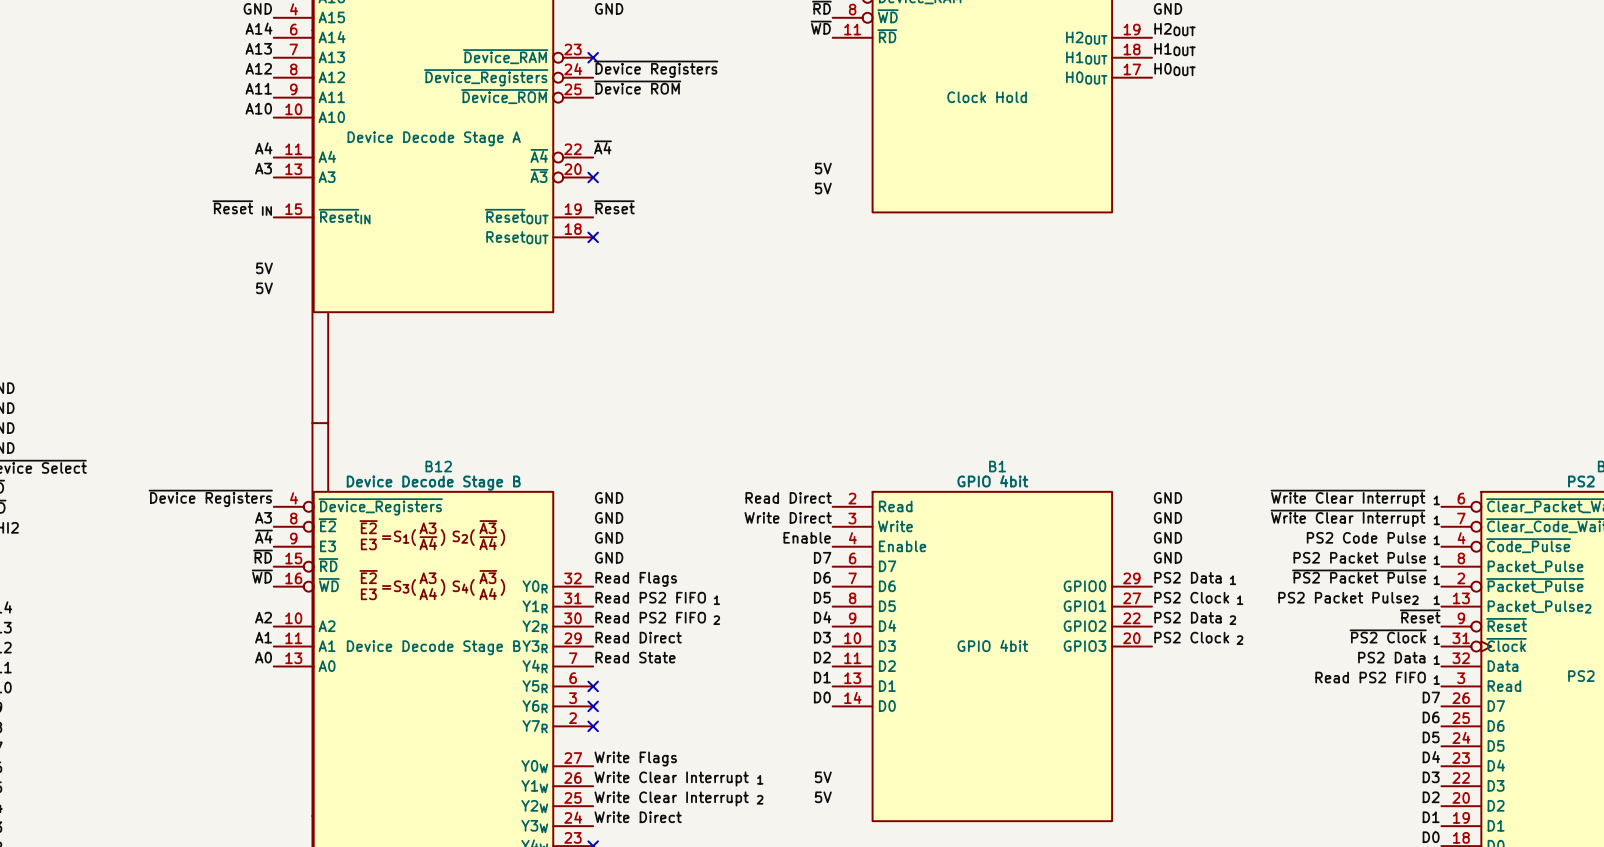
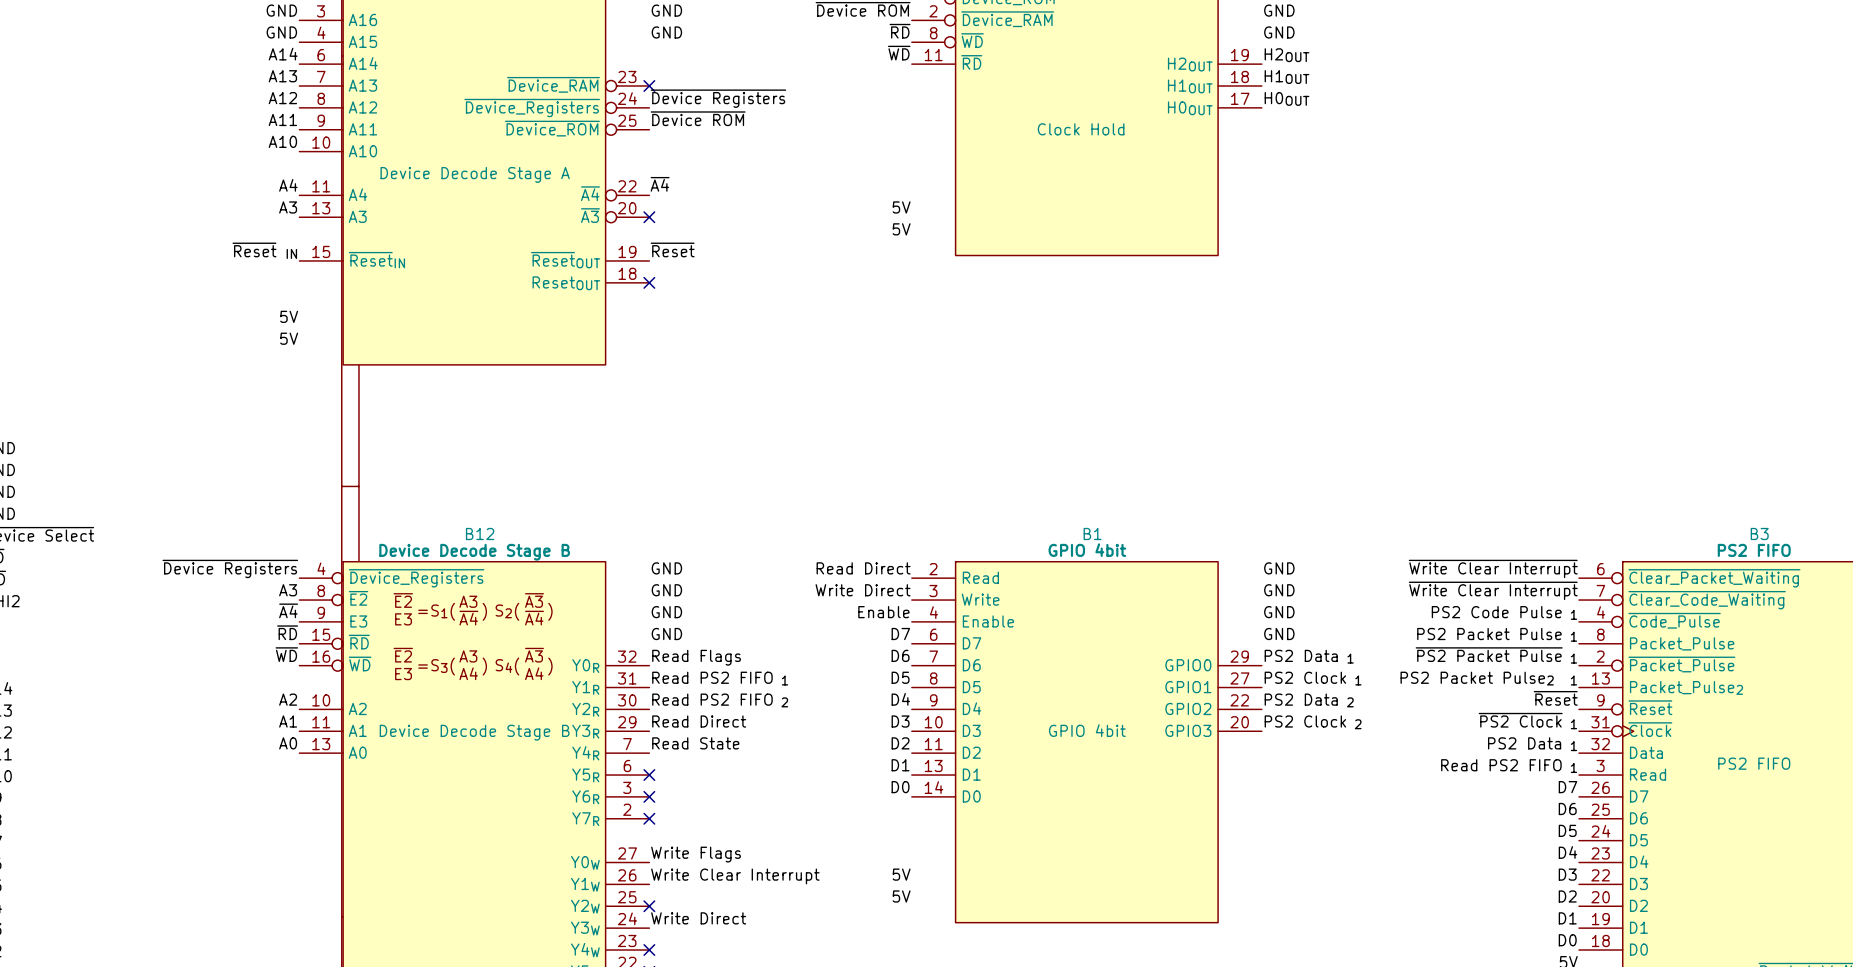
label: ~{Write Clear Interrupt} 1 (1355, 498) -> ~{Write Clear Interrupt} (1493, 568)
label: ~{Write Clear Interrupt} 1 (1355, 518) -> ~{Write Clear Interrupt} (1493, 590)
label: Write Clear Interrupt 1 (678, 779) -> Write Clear Interrupt (735, 876)
label: Write Clear Interrupt 2 (678, 798) -> none
no-connect mark: none -> (649, 906)

